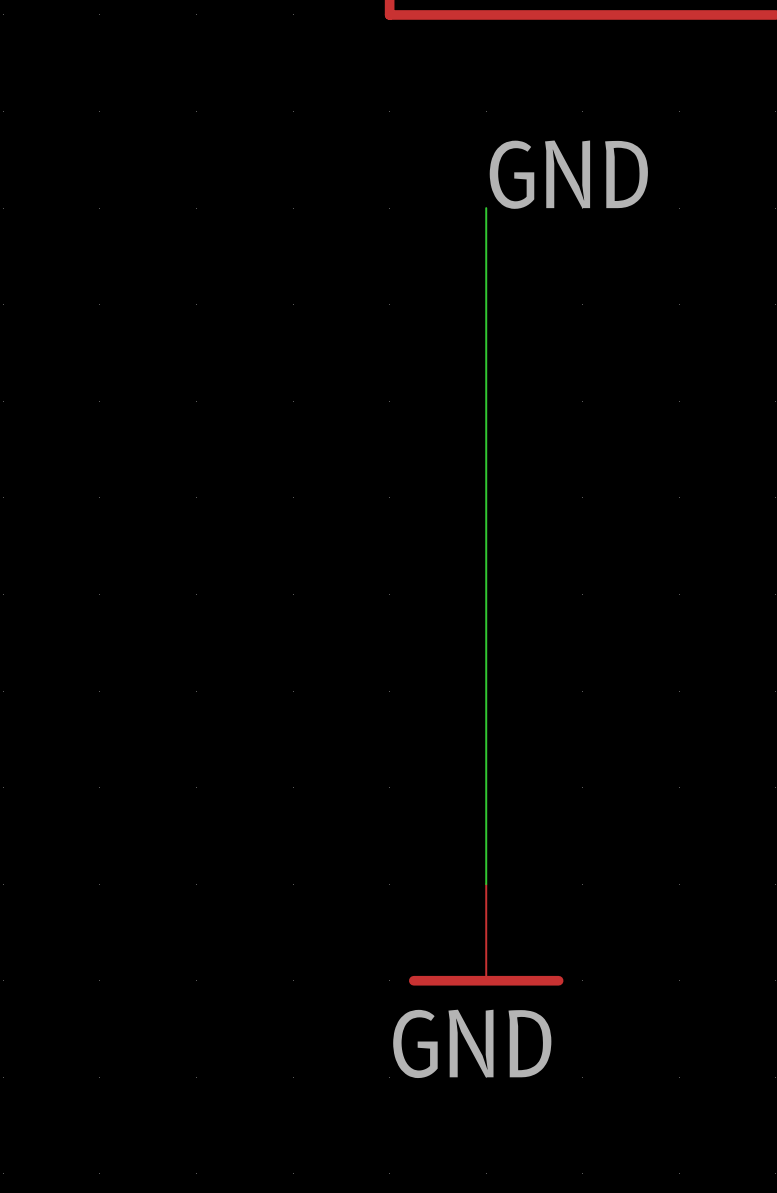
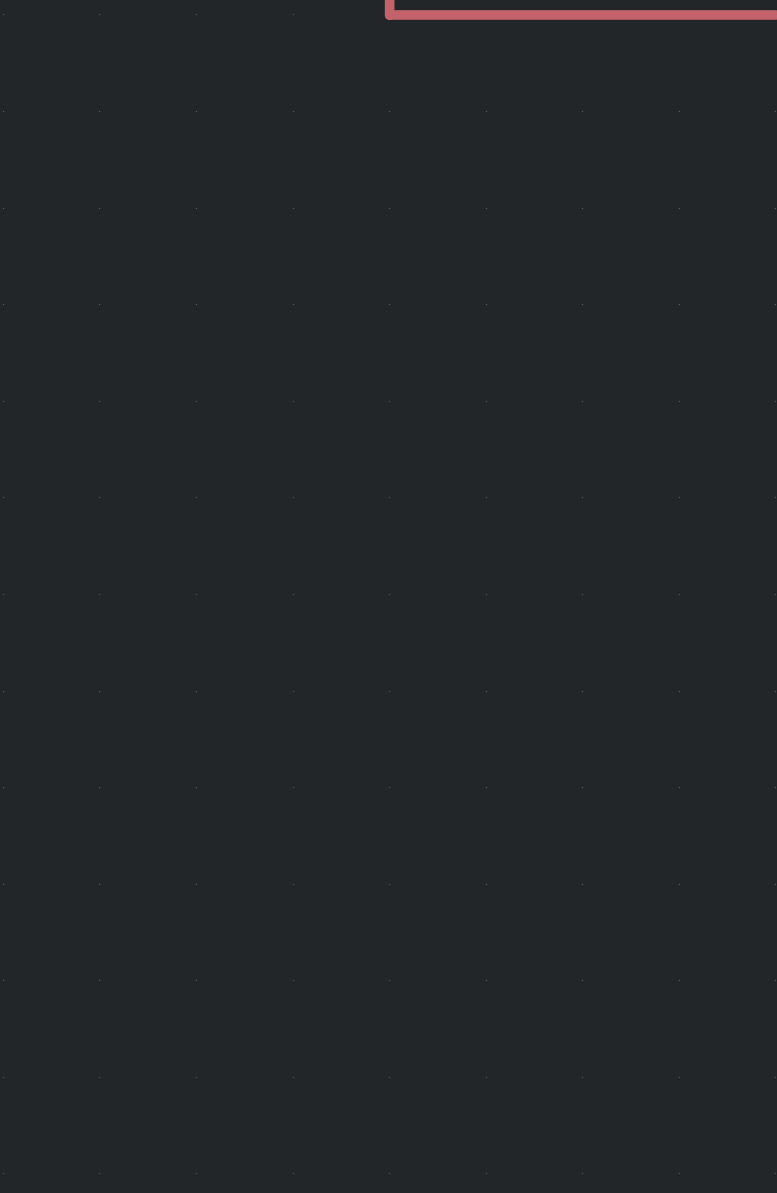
label: GND (568, 174) -> none
wire: (486, 208) (486, 884) -> none
power symbol: GND (486, 934) -> none

